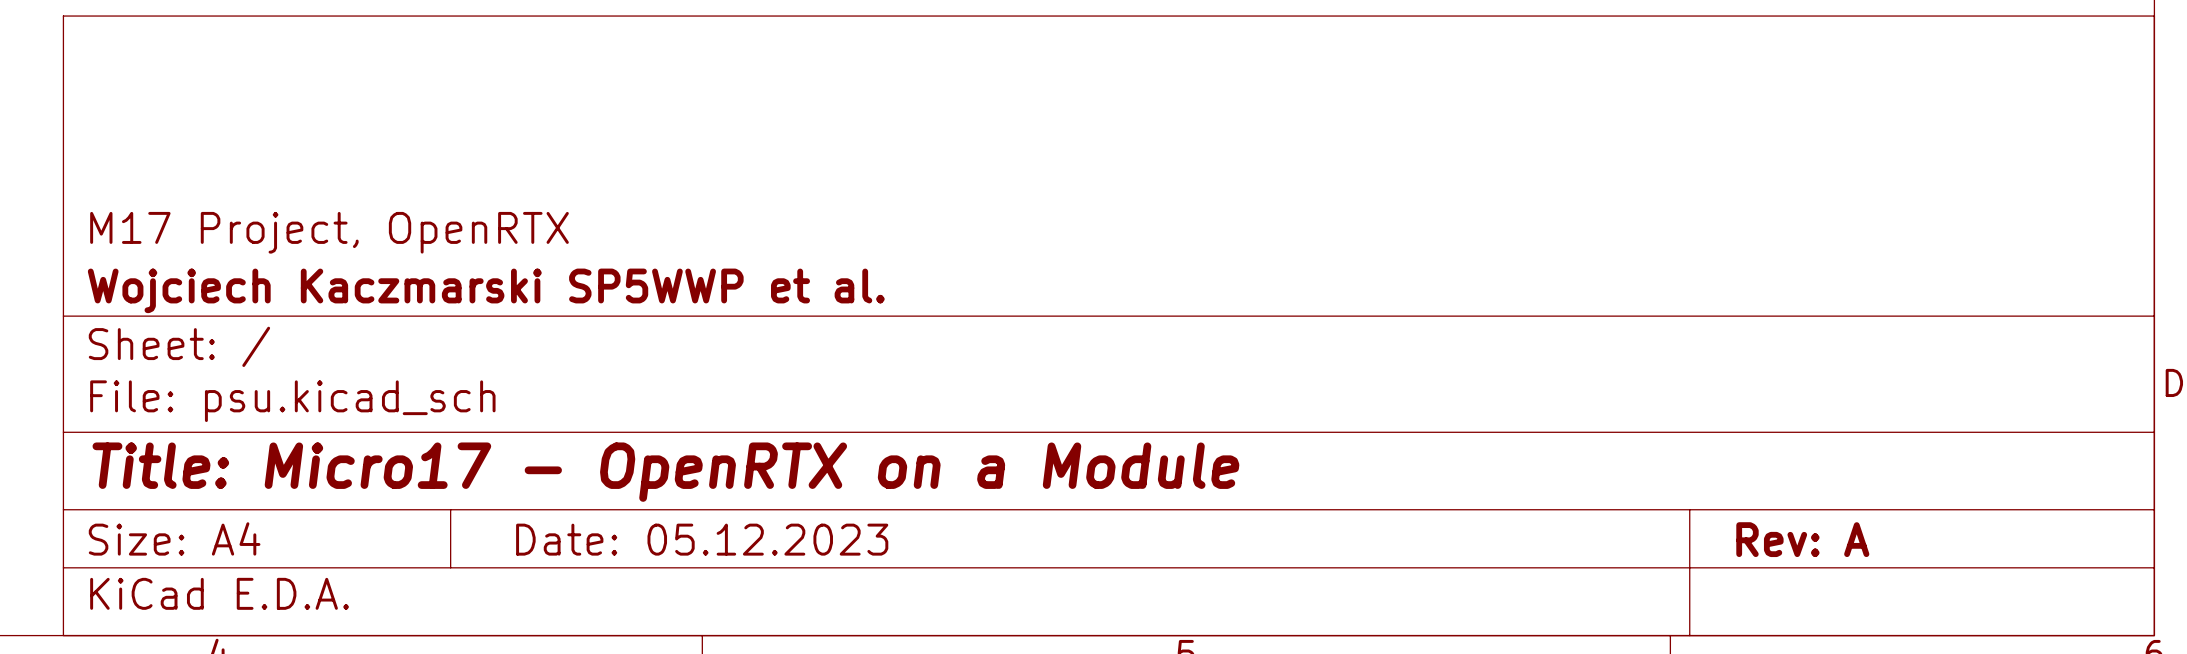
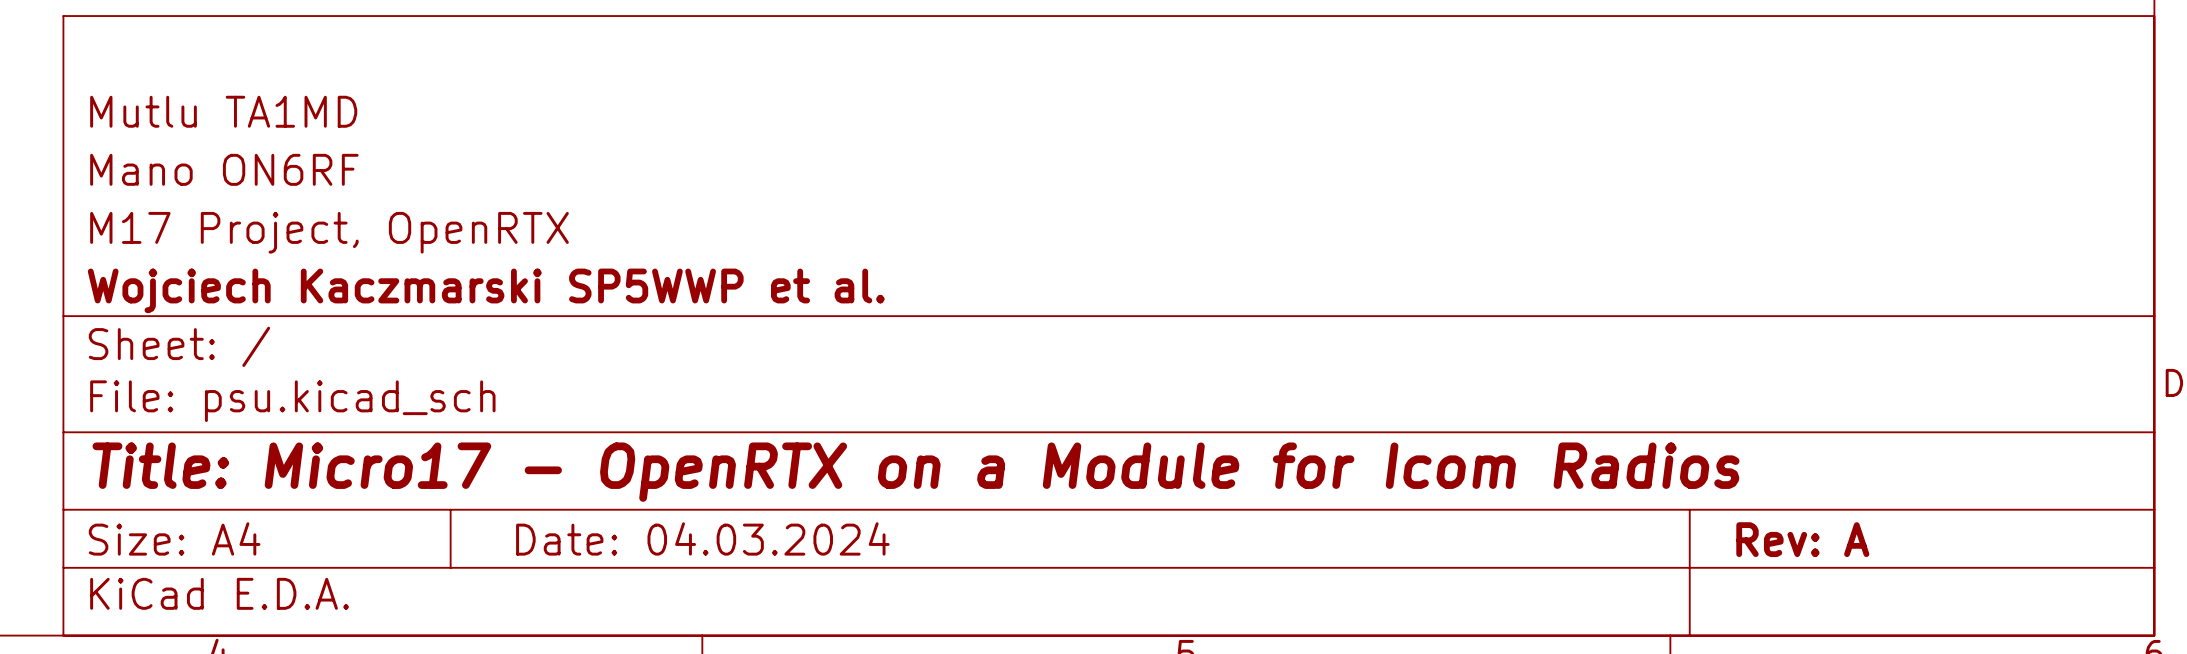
title block: none -> Mutlu TA1MD (223, 111)
title block: none -> Mano ON6RF (224, 169)
title block: Title: Micro17 - OpenRTX on a Module (665, 472) -> Title: Micro17 - OpenRTX on a Module for Icom Radios (916, 472)
title block: Date: 05.12.2023 (702, 539) -> Date: 04.03.2024 (702, 538)

